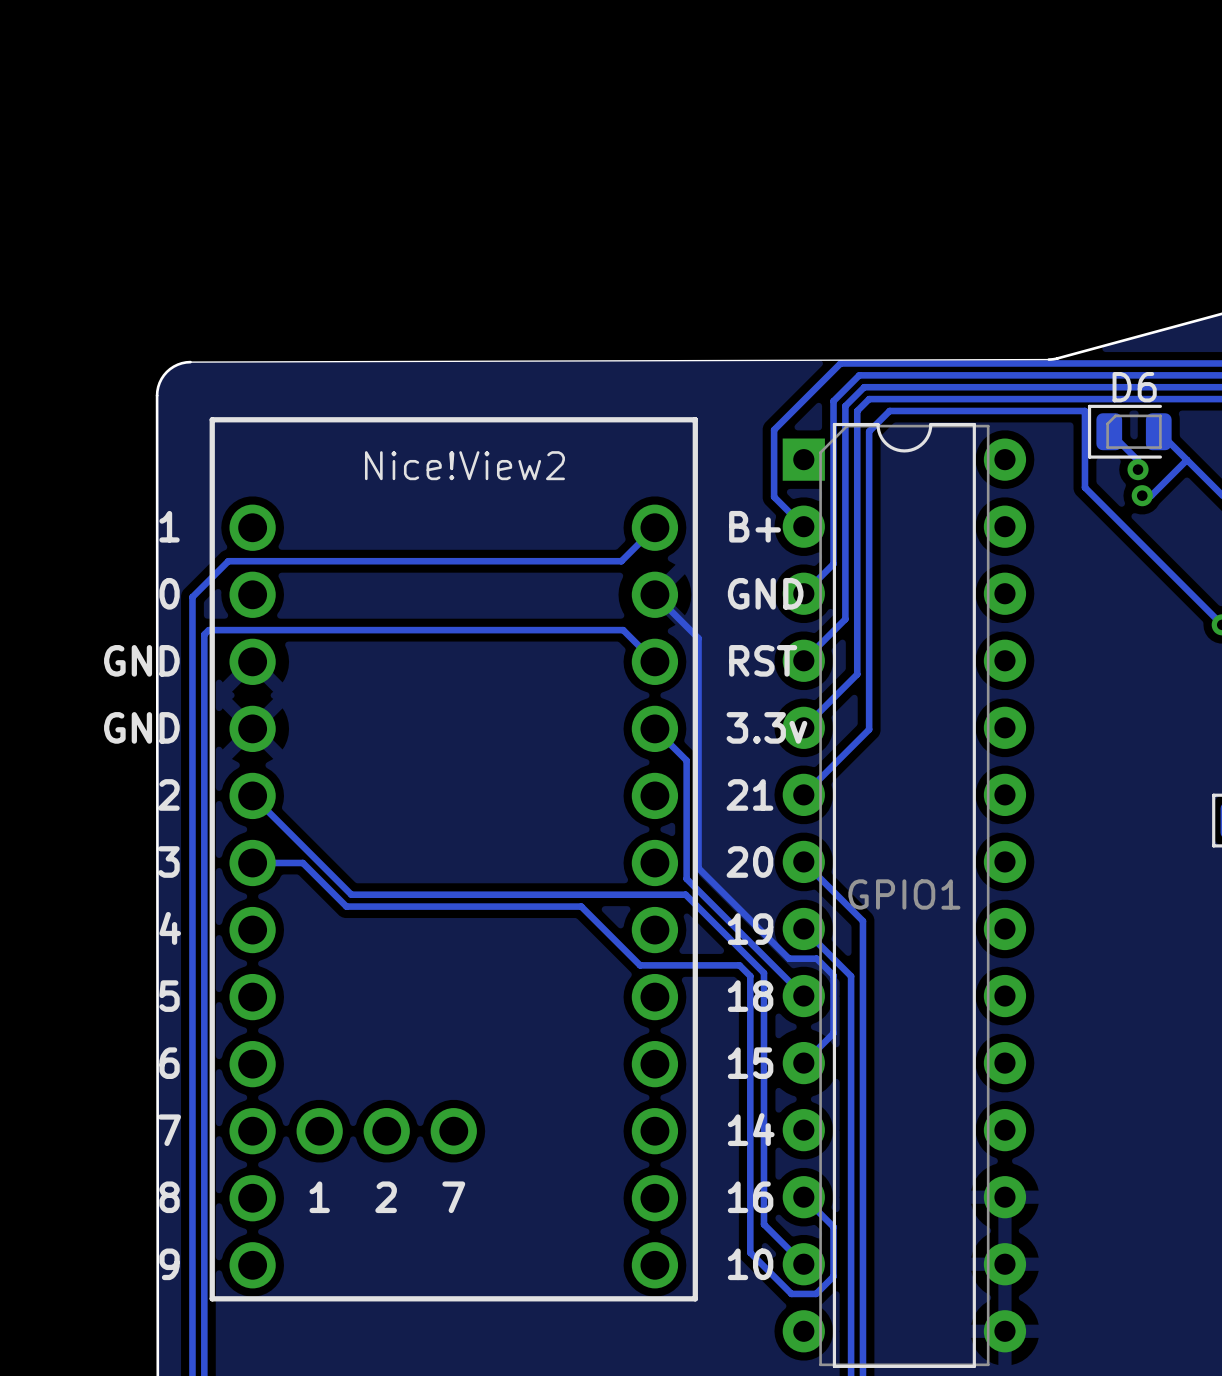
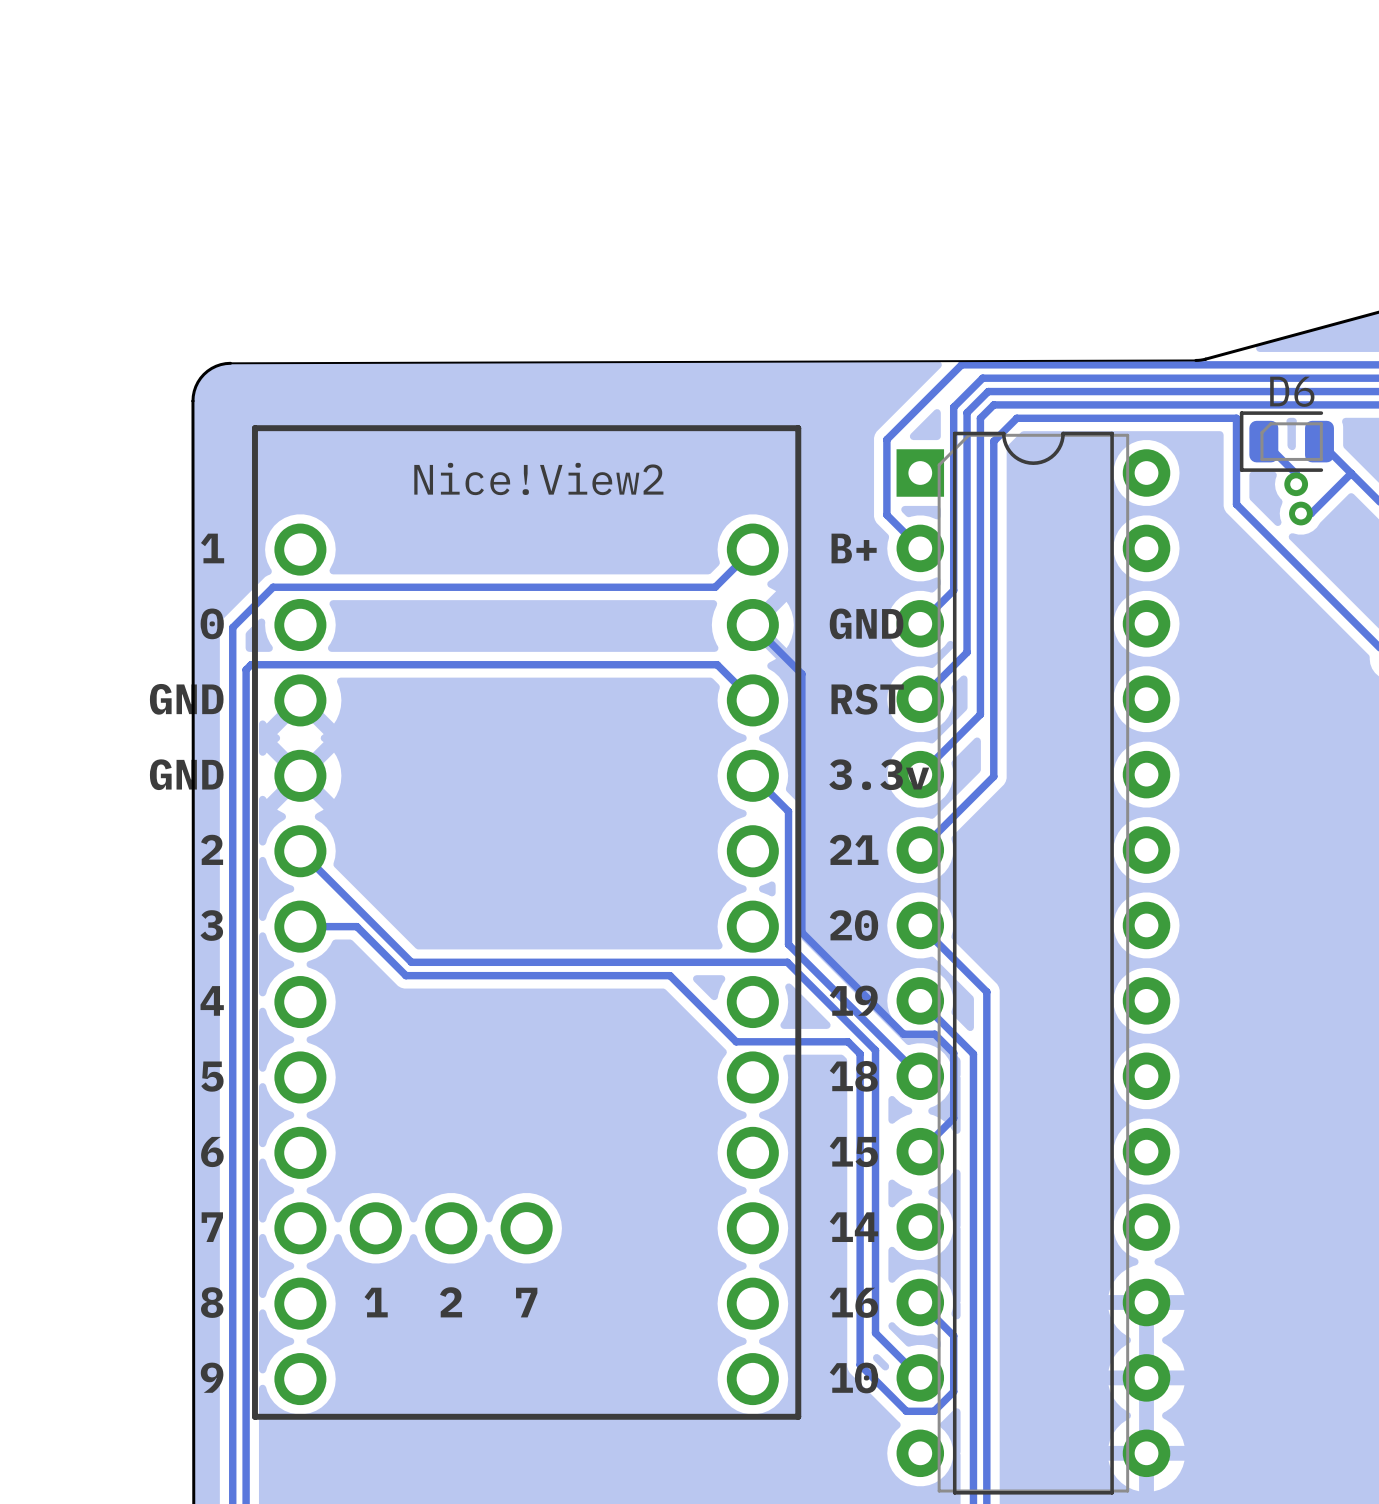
GPIO1 name: GPIO1 (904, 894) -> none

